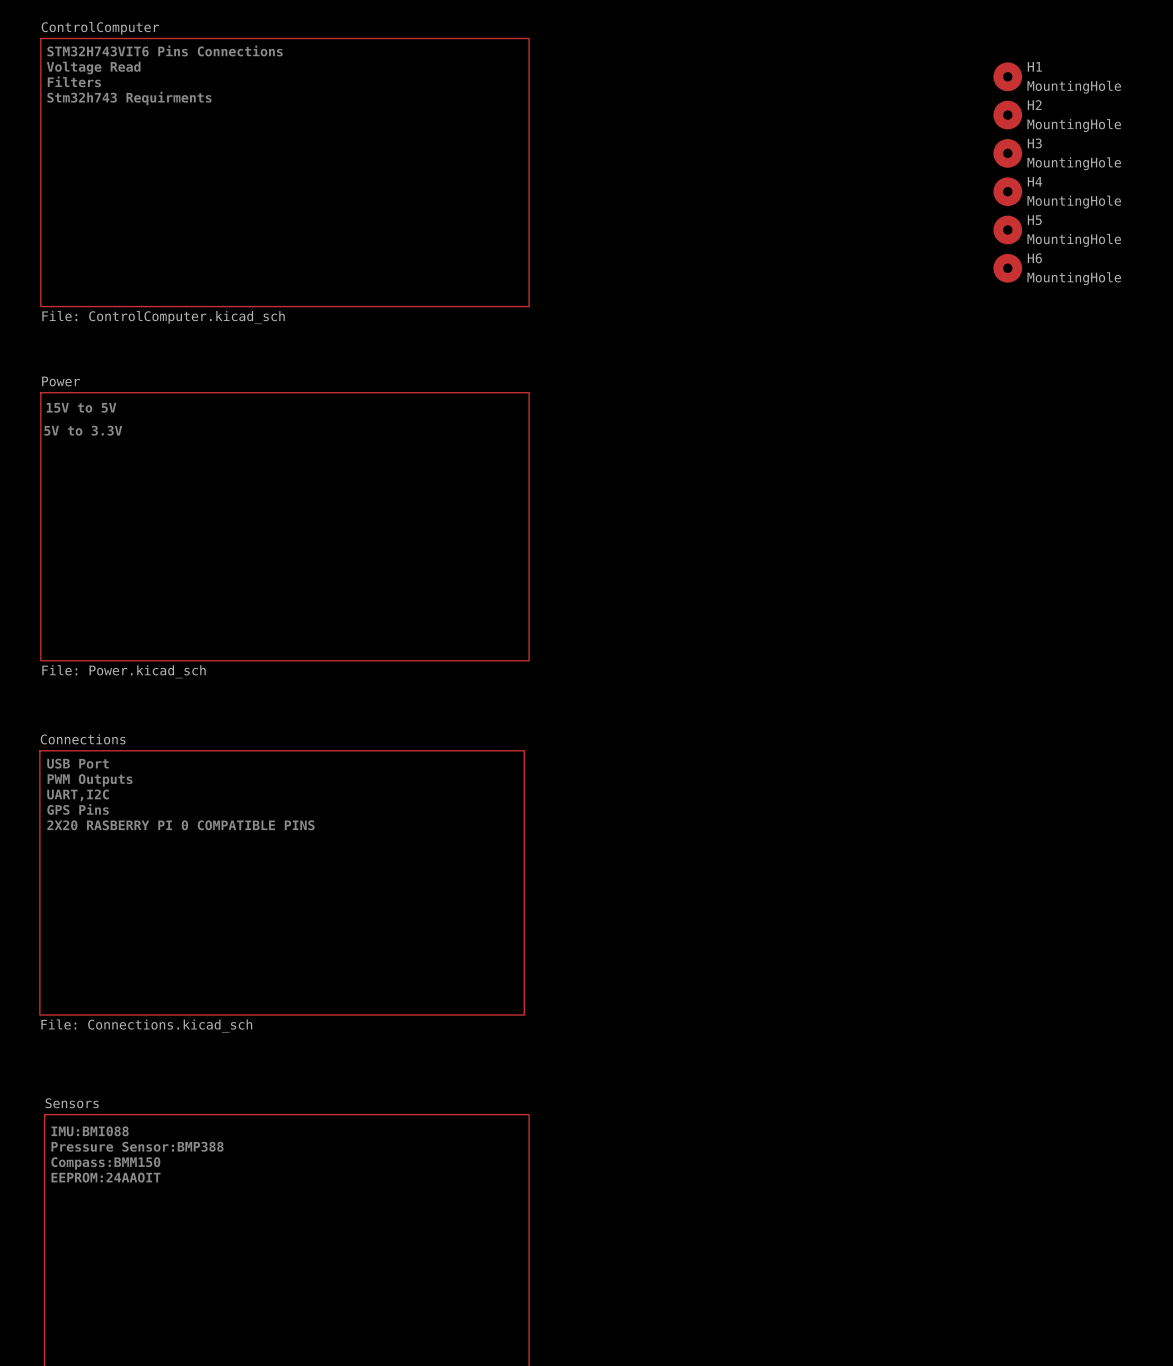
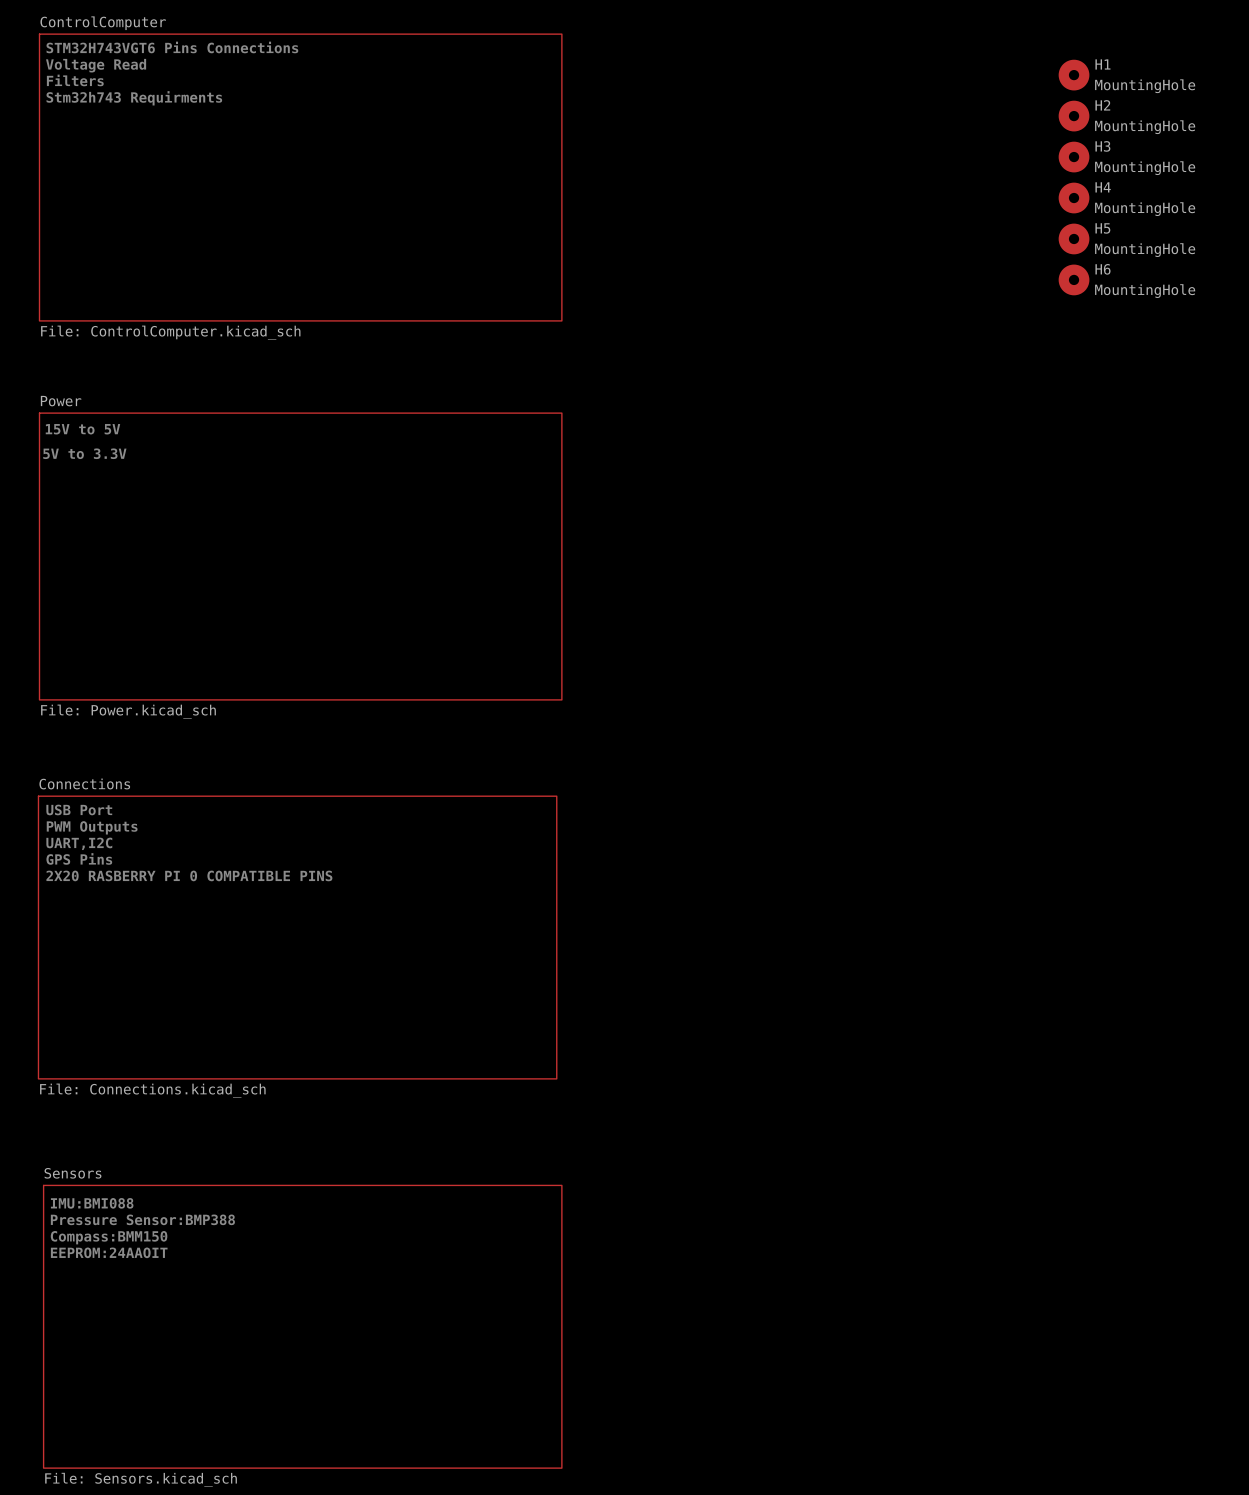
text: STM32H743VIT6 Pins Connections (165, 50) -> STM32H743VGT6 Pins Connections (172, 47)

